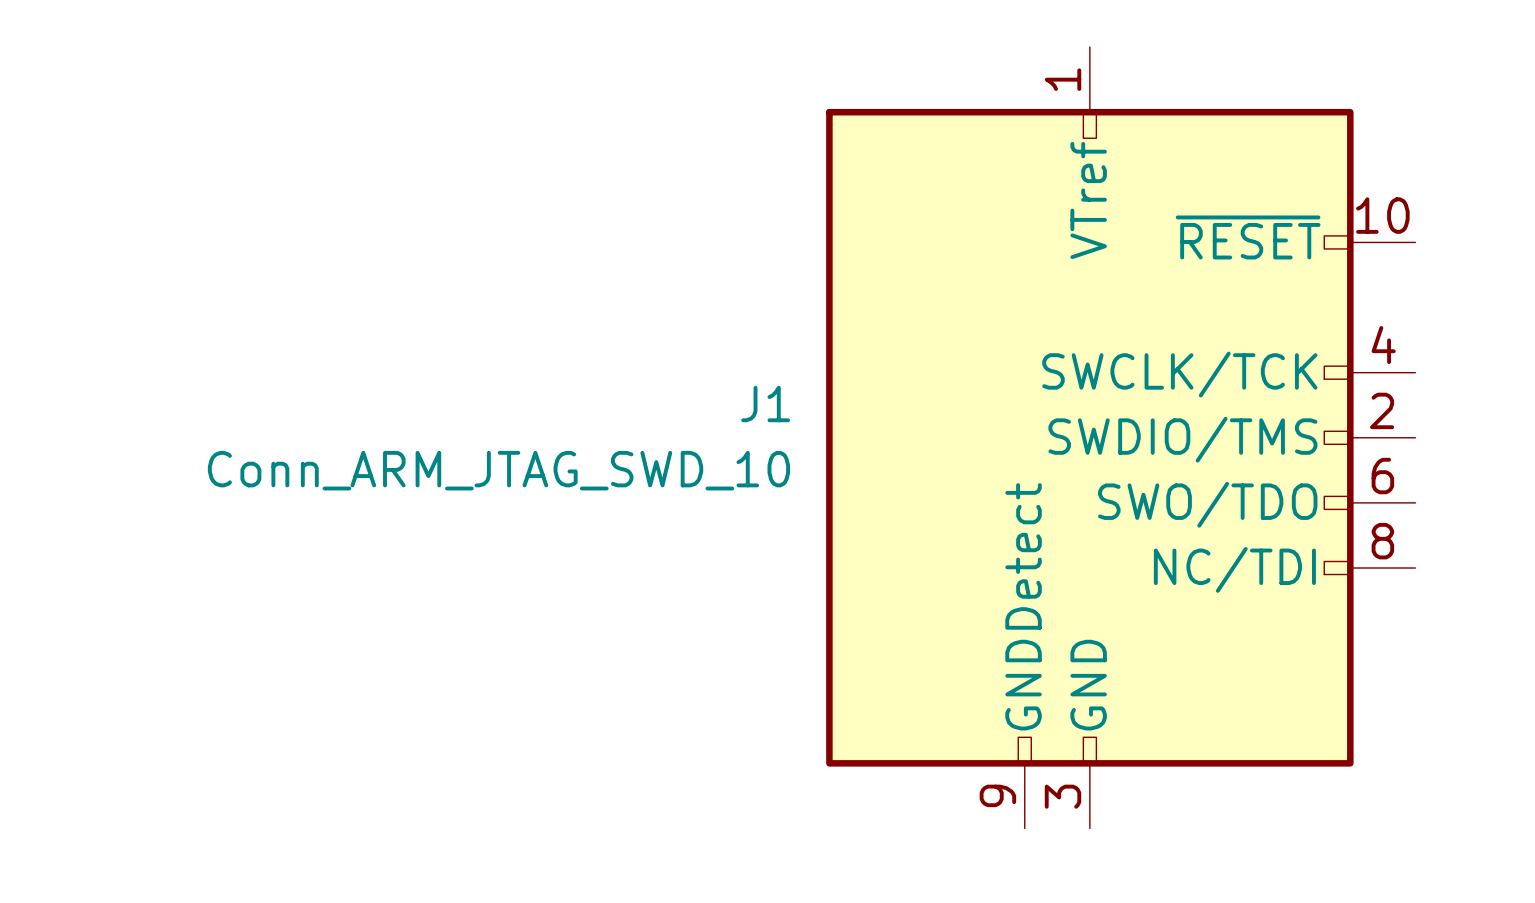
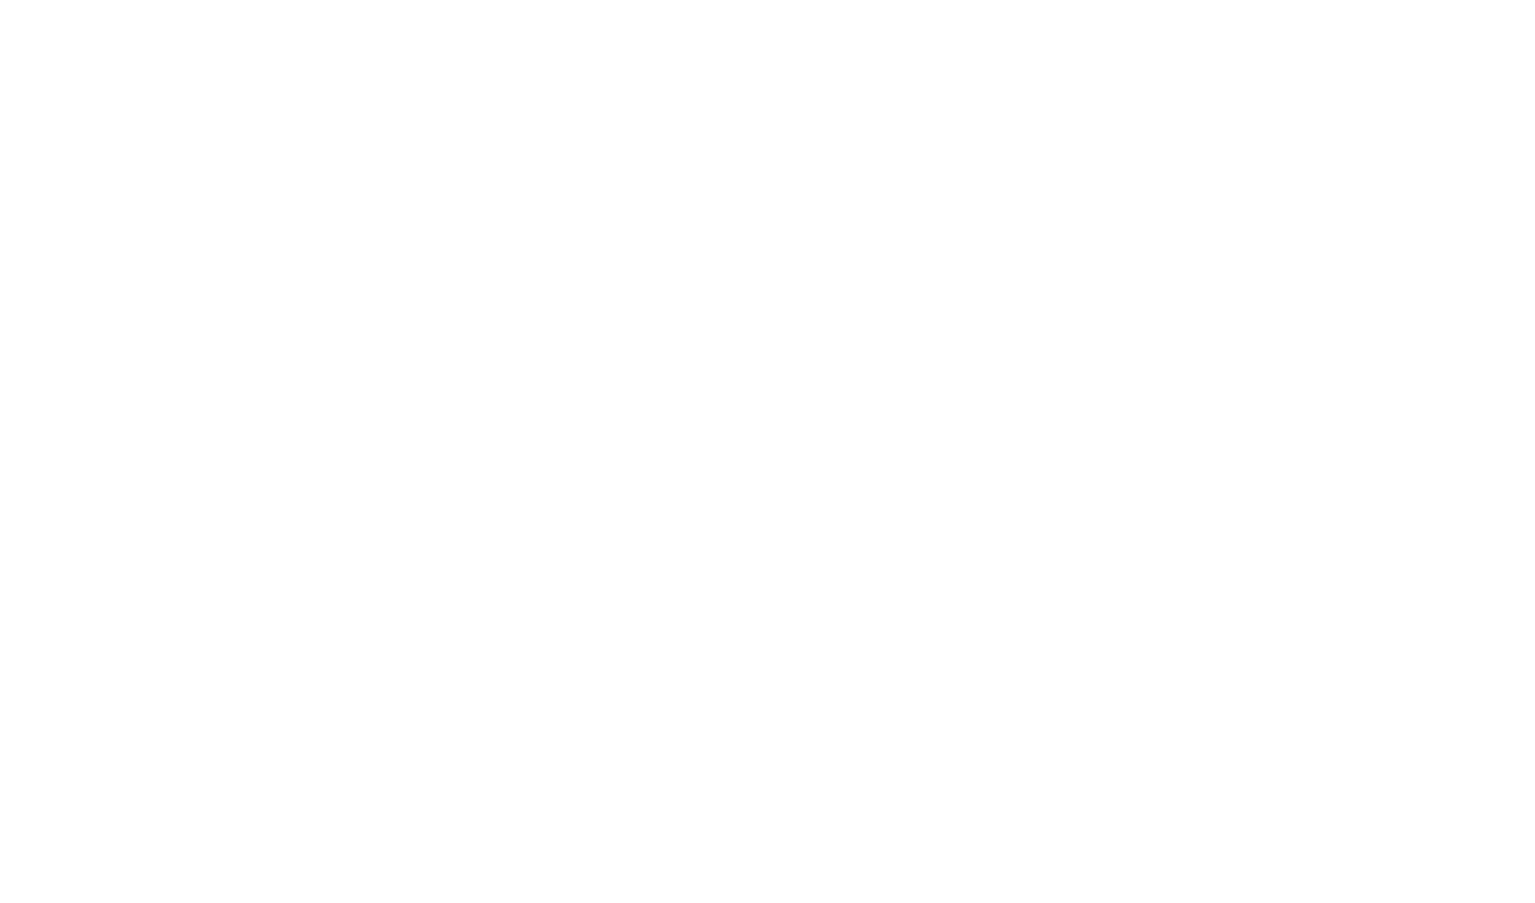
J1: Conn_ARM_JTAG_SWD_10 (1120, 437) -> none

